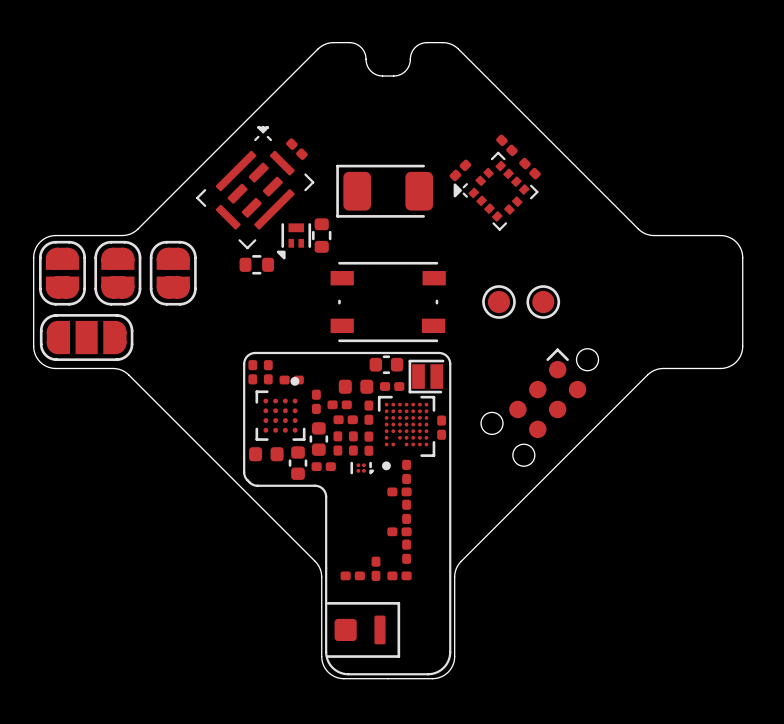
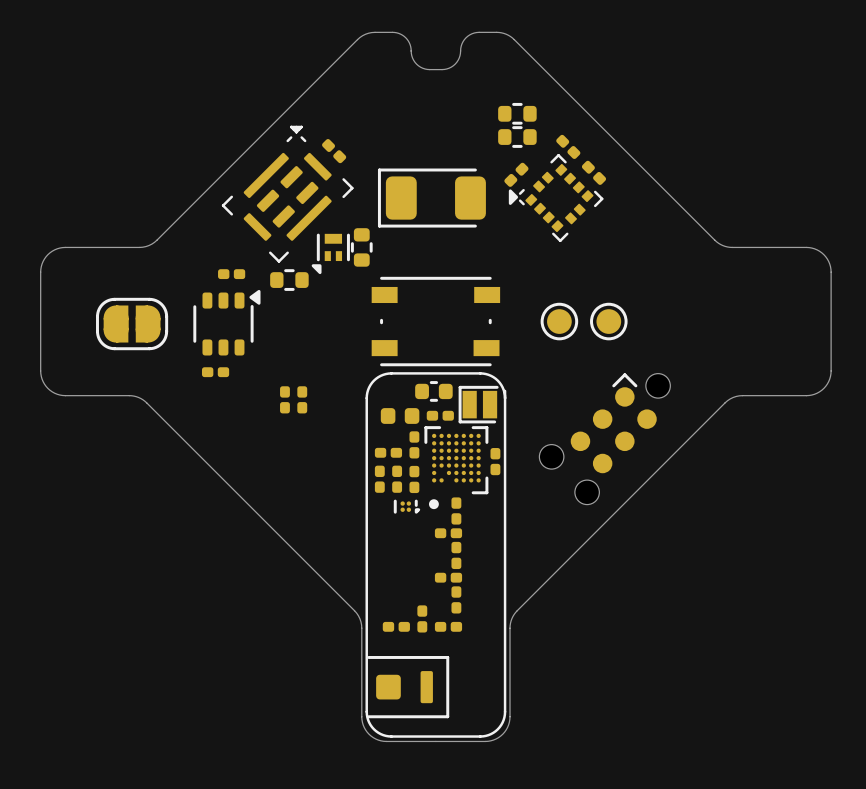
part: none -> (517, 113)
part: none -> (517, 137)
part: none -> (231, 274)
part rotation: 0° (62, 273) -> 90° counterclockwise (132, 324)
part position: (62, 273) -> (132, 324)
part: (117, 273) -> none
part: (173, 273) -> none
part: none -> (226, 322)
part: (86, 337) -> none
part: none -> (215, 372)
line: (450, 364) (446, 356) (439, 352) (255, 352) (247, 356) (244, 364) (245, 477) (251, 483) (256, 485) (317, 486) (323, 490) (326, 496) -> (505, 398) (499, 382) (491, 375) (483, 373) (388, 373) (373, 380) (368, 389) (366, 398) (366, 538)
part: (291, 380) -> none
part: (316, 401) -> none
part: (339, 404) -> none
part: (280, 408) -> none
part: (318, 439) -> none
part: (266, 454) -> none
part: (298, 463) -> none
part: (323, 466) -> none

